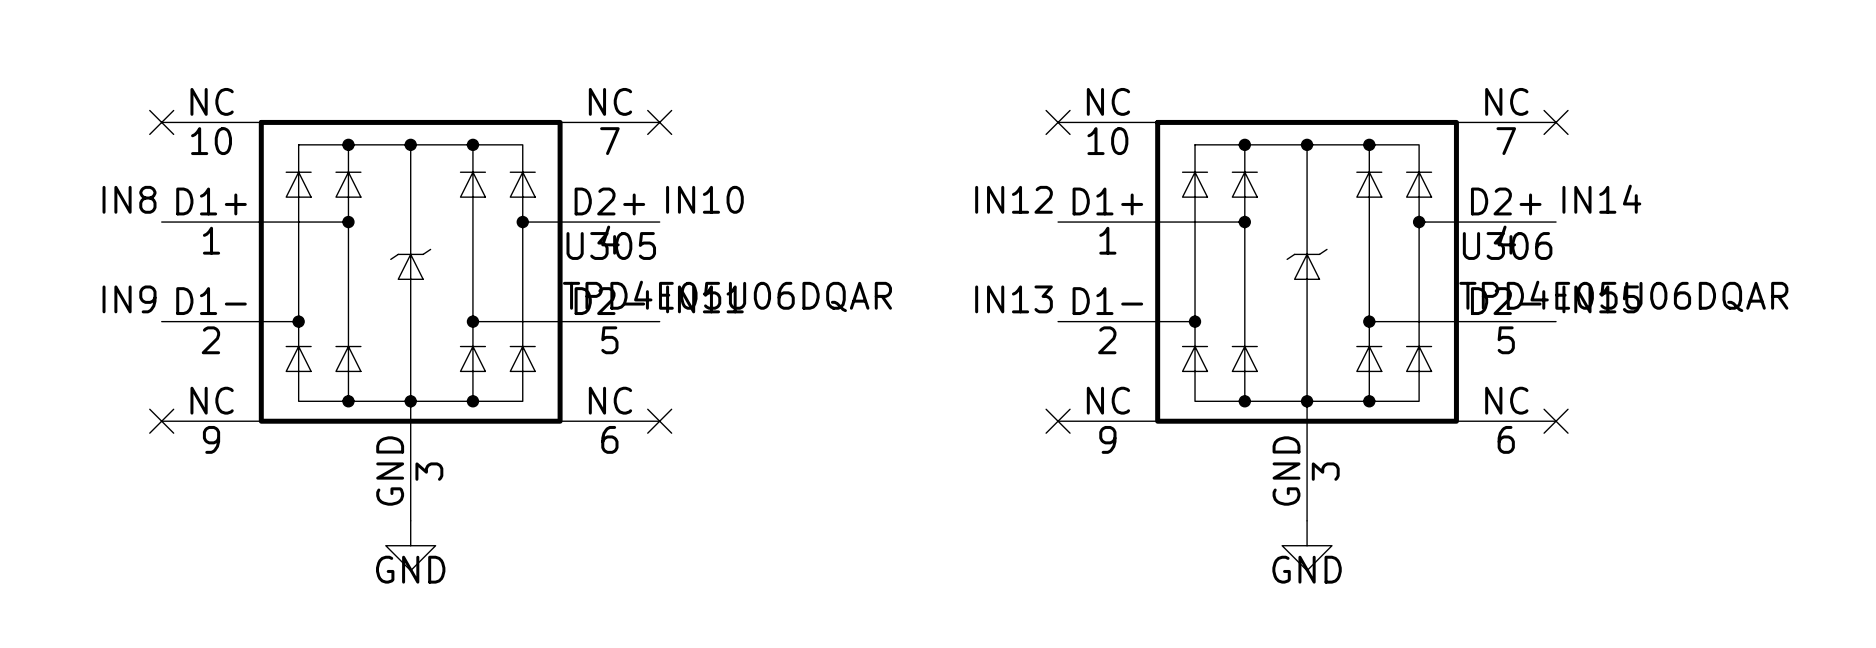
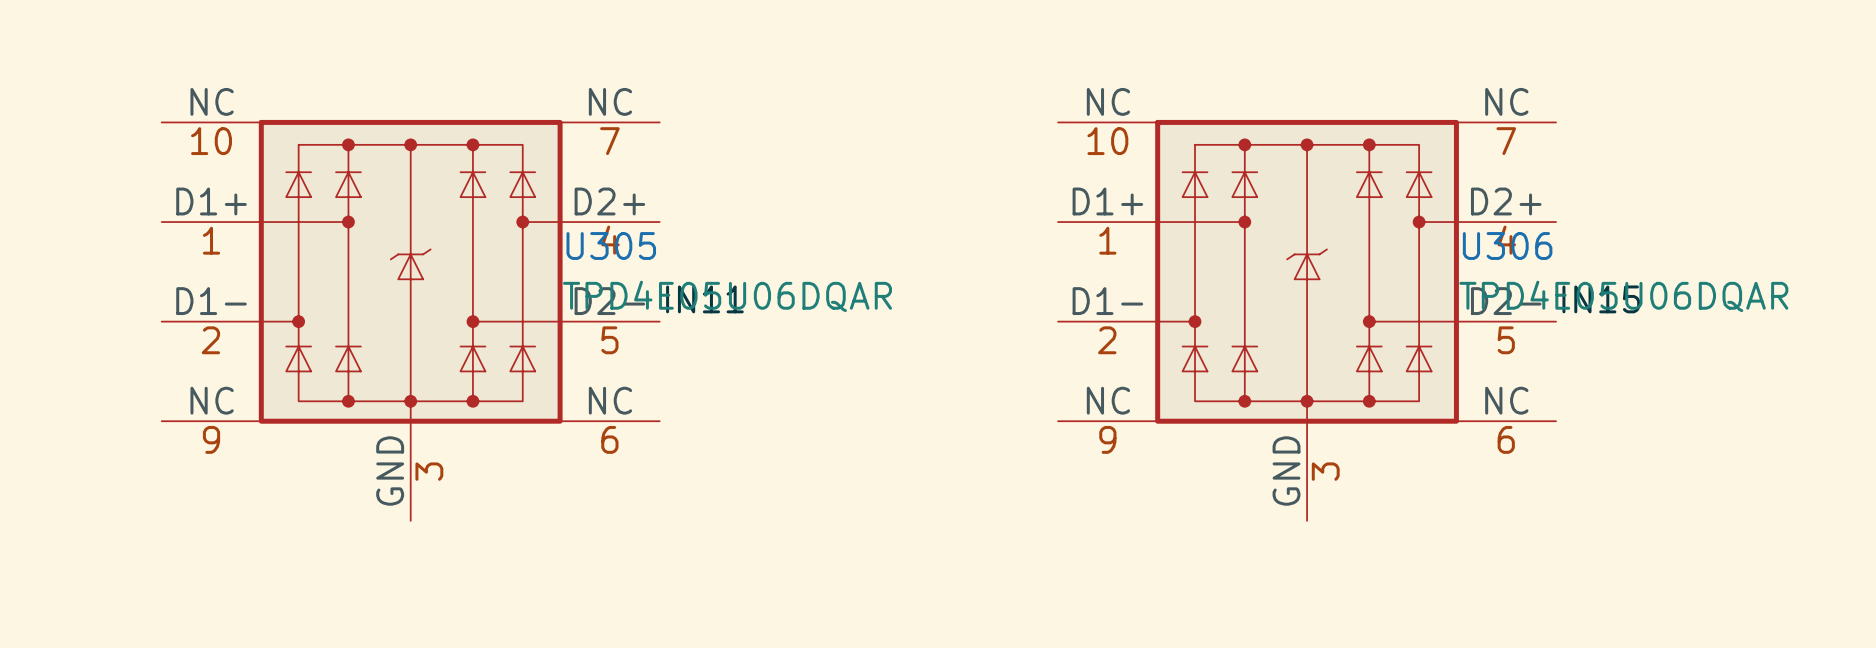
no-connect mark: (161, 122) -> none
no-connect mark: (659, 122) -> none
no-connect mark: (1058, 122) -> none
no-connect mark: (1556, 122) -> none
label: IN8 (129, 199) -> none
label: IN10 (704, 199) -> none
label: IN12 (1014, 199) -> none
label: IN14 (1601, 199) -> none
label: IN9 (129, 299) -> none
label: IN13 (1014, 299) -> none
no-connect mark: (161, 421) -> none
no-connect mark: (659, 421) -> none
no-connect mark: (1058, 421) -> none
no-connect mark: (1556, 421) -> none
power symbol: GND (410, 545) -> none
power symbol: GND (1307, 545) -> none

